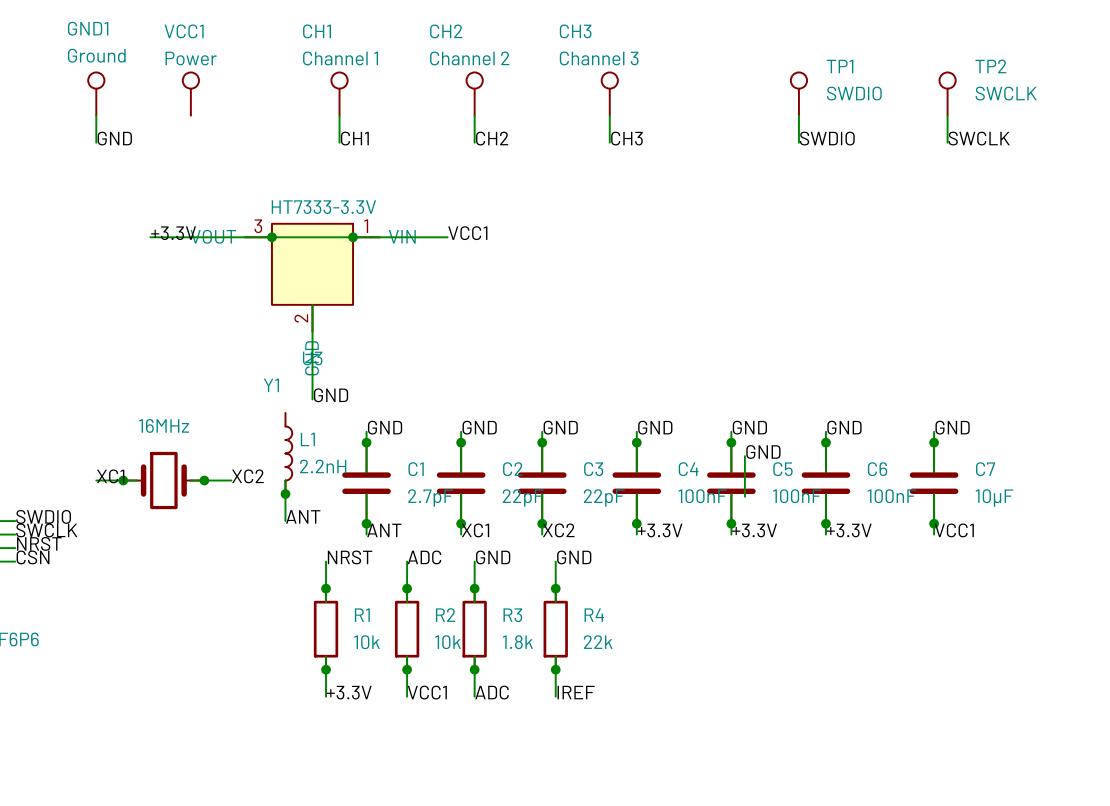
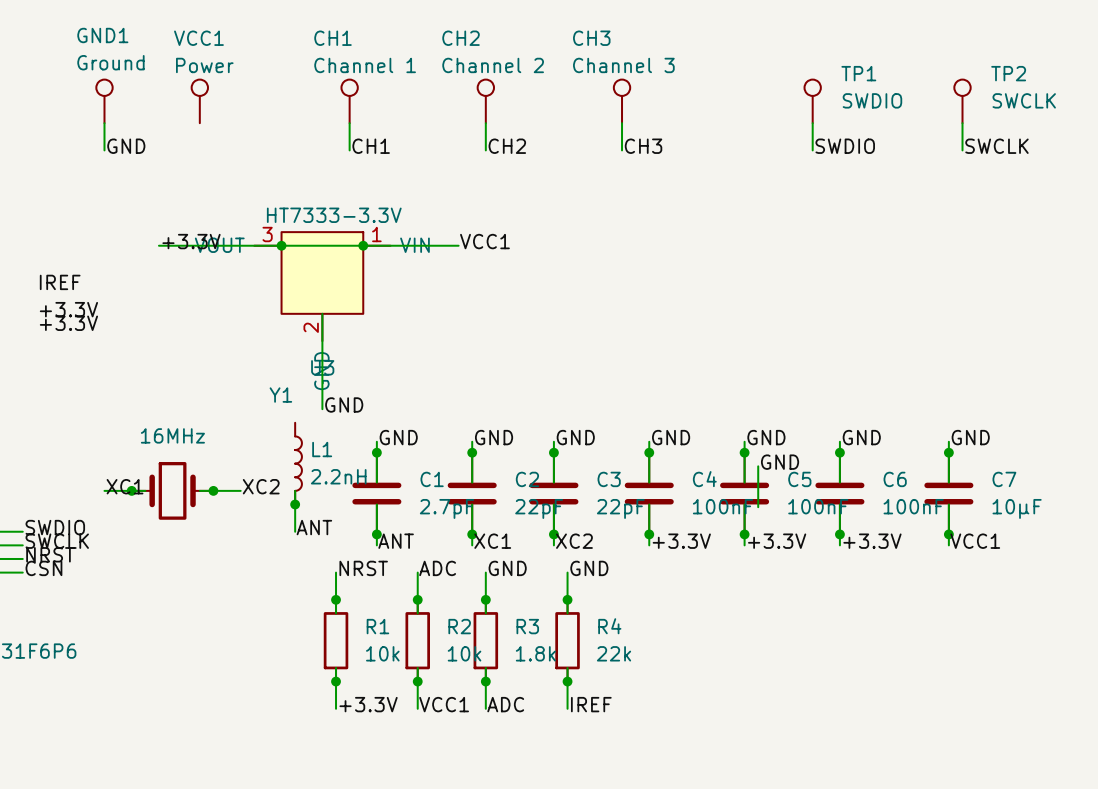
label: none -> IREF (60, 282)
label: none -> +3.3V (68, 309)
label: none -> +3.3V (68, 323)

